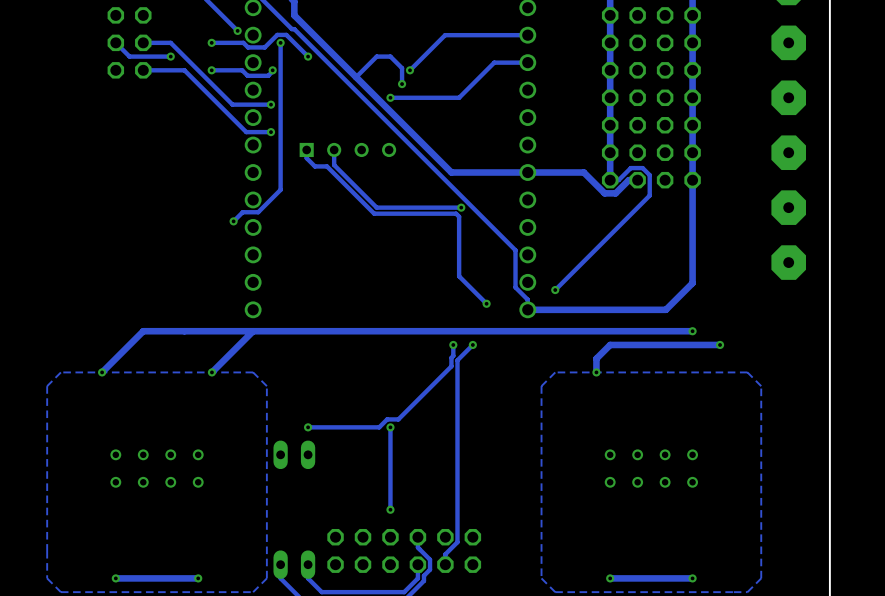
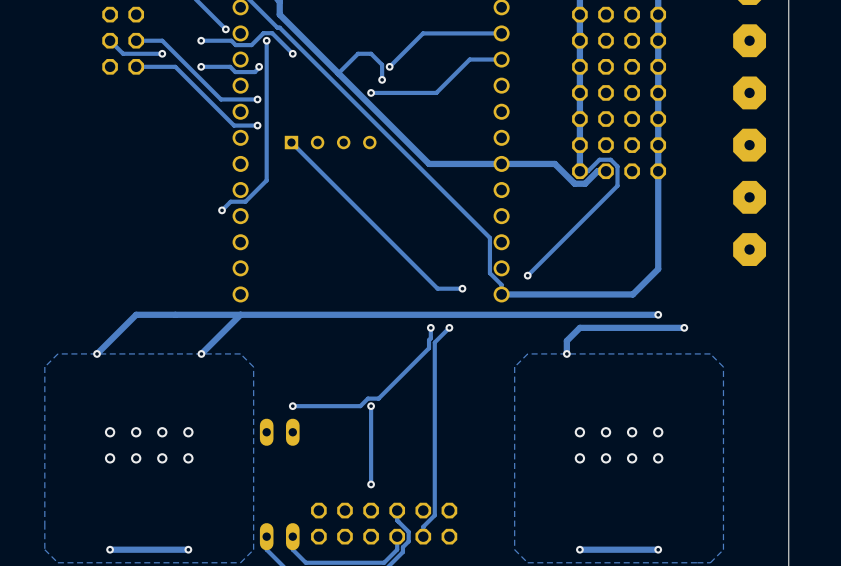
track: (306, 149) (306, 158) (314, 166) (326, 166) (374, 213) (456, 213) (459, 216) (459, 276) (486, 303) -> (291, 142) (437, 288) (462, 288)
track: (334, 149) (334, 165) (376, 207) (461, 207) -> none
via: (461, 207) -> none

